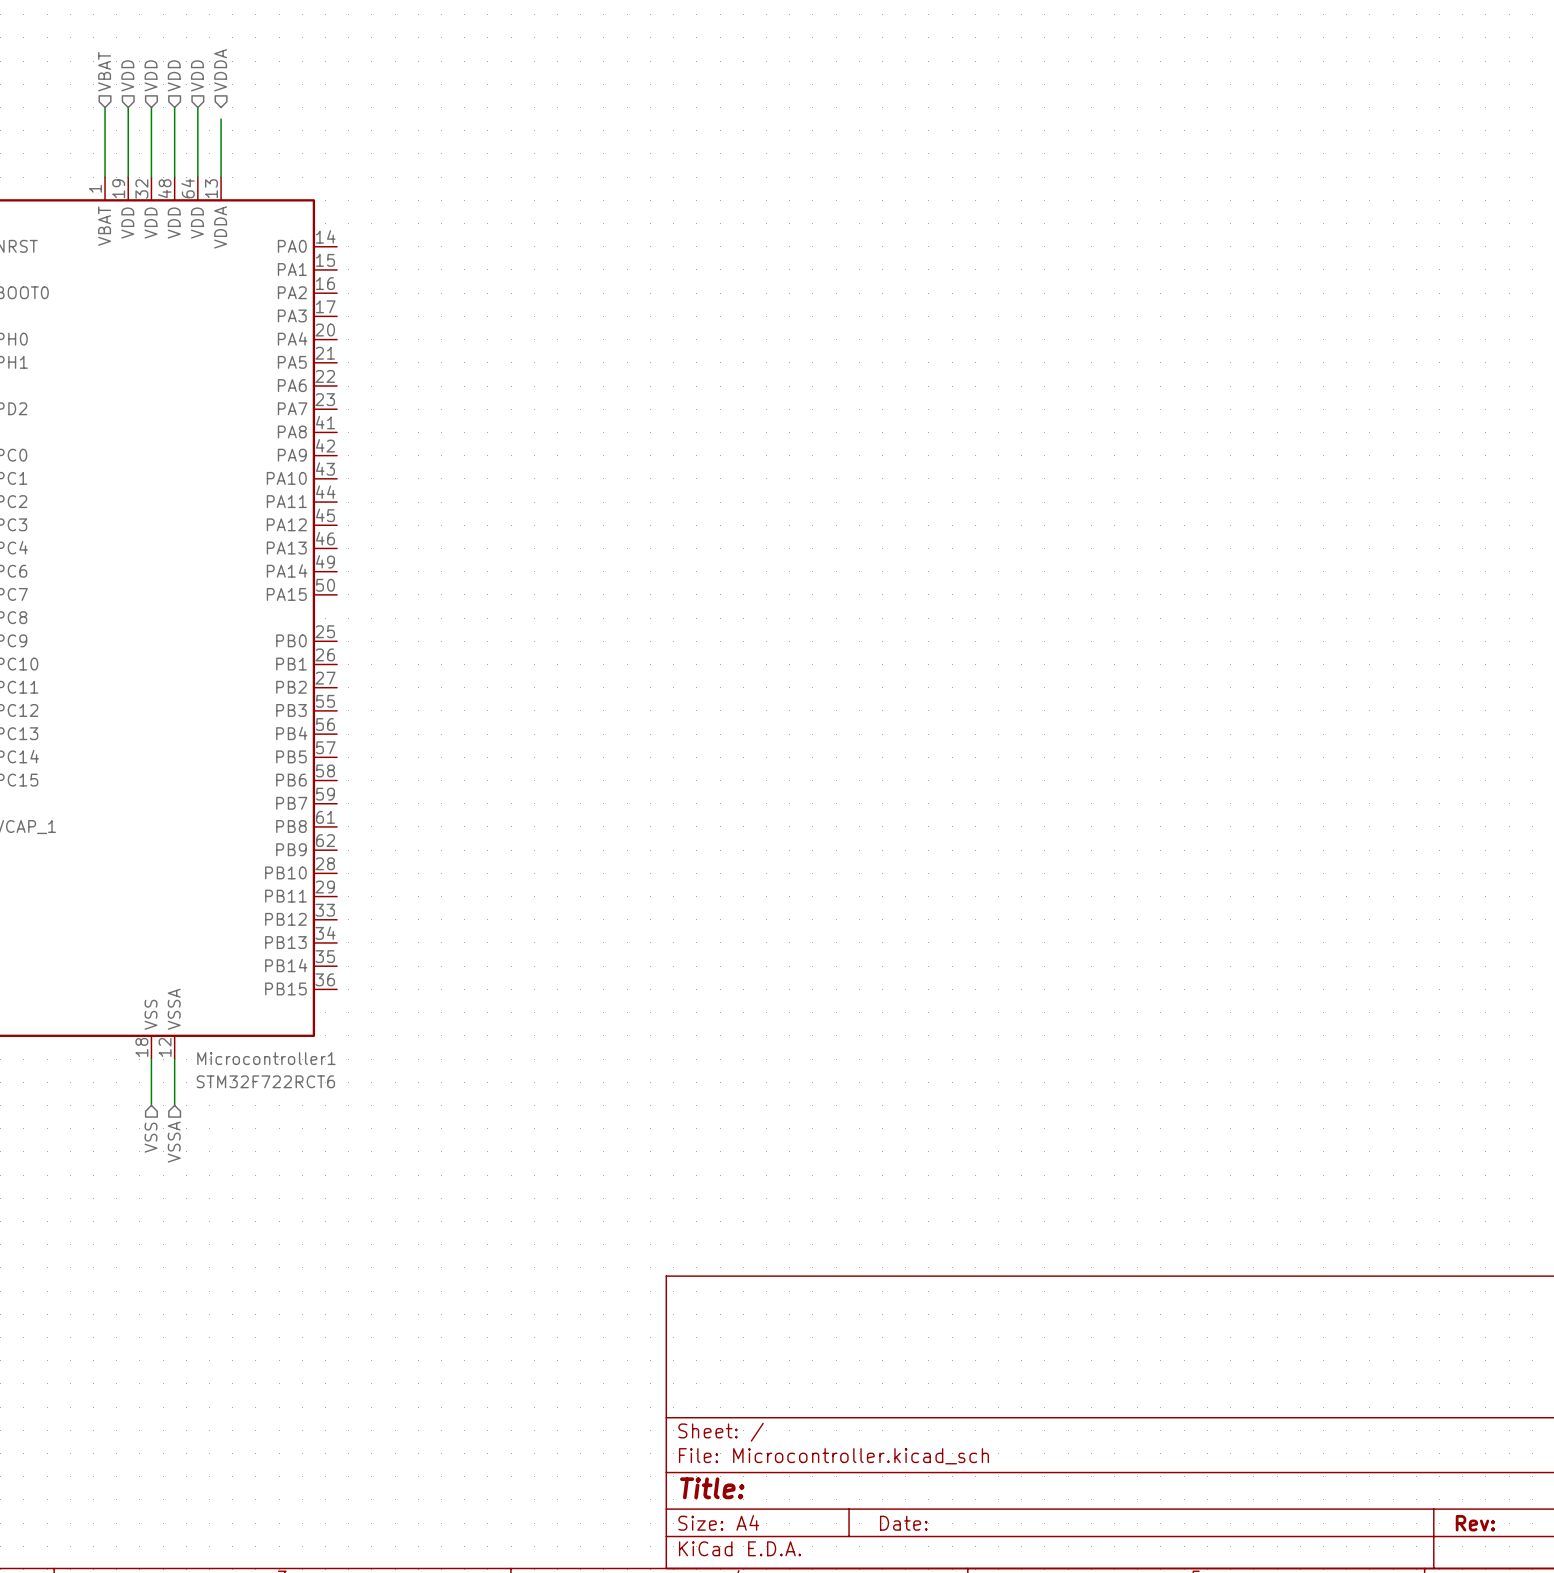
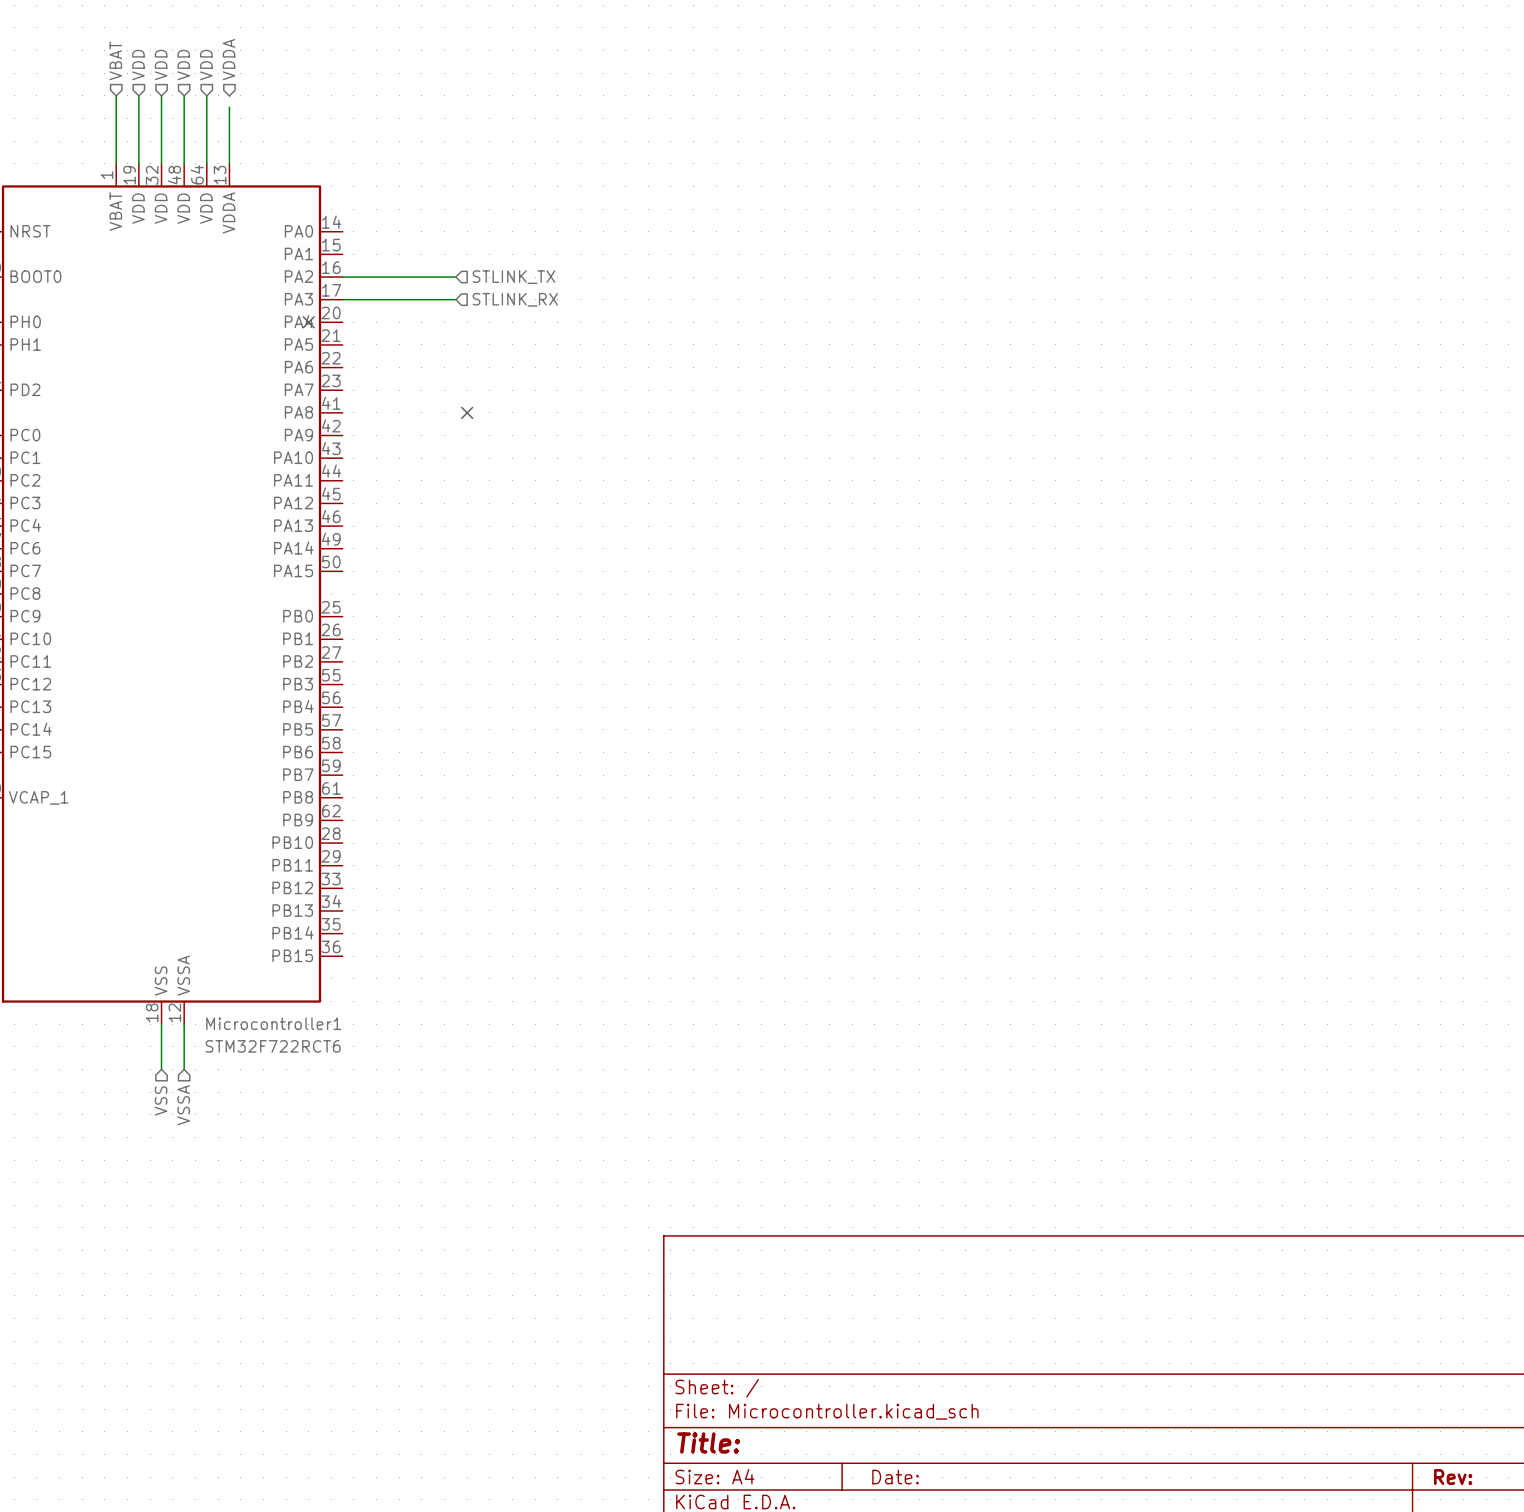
wire: none -> (342, 277) (455, 277)
hierarchical label: none -> STLINK_TX (513, 277)
wire: none -> (342, 299) (455, 299)
hierarchical label: none -> STLINK_RX (515, 299)
no-connect mark: none -> (308, 322)
no-connect mark: none -> (467, 412)

